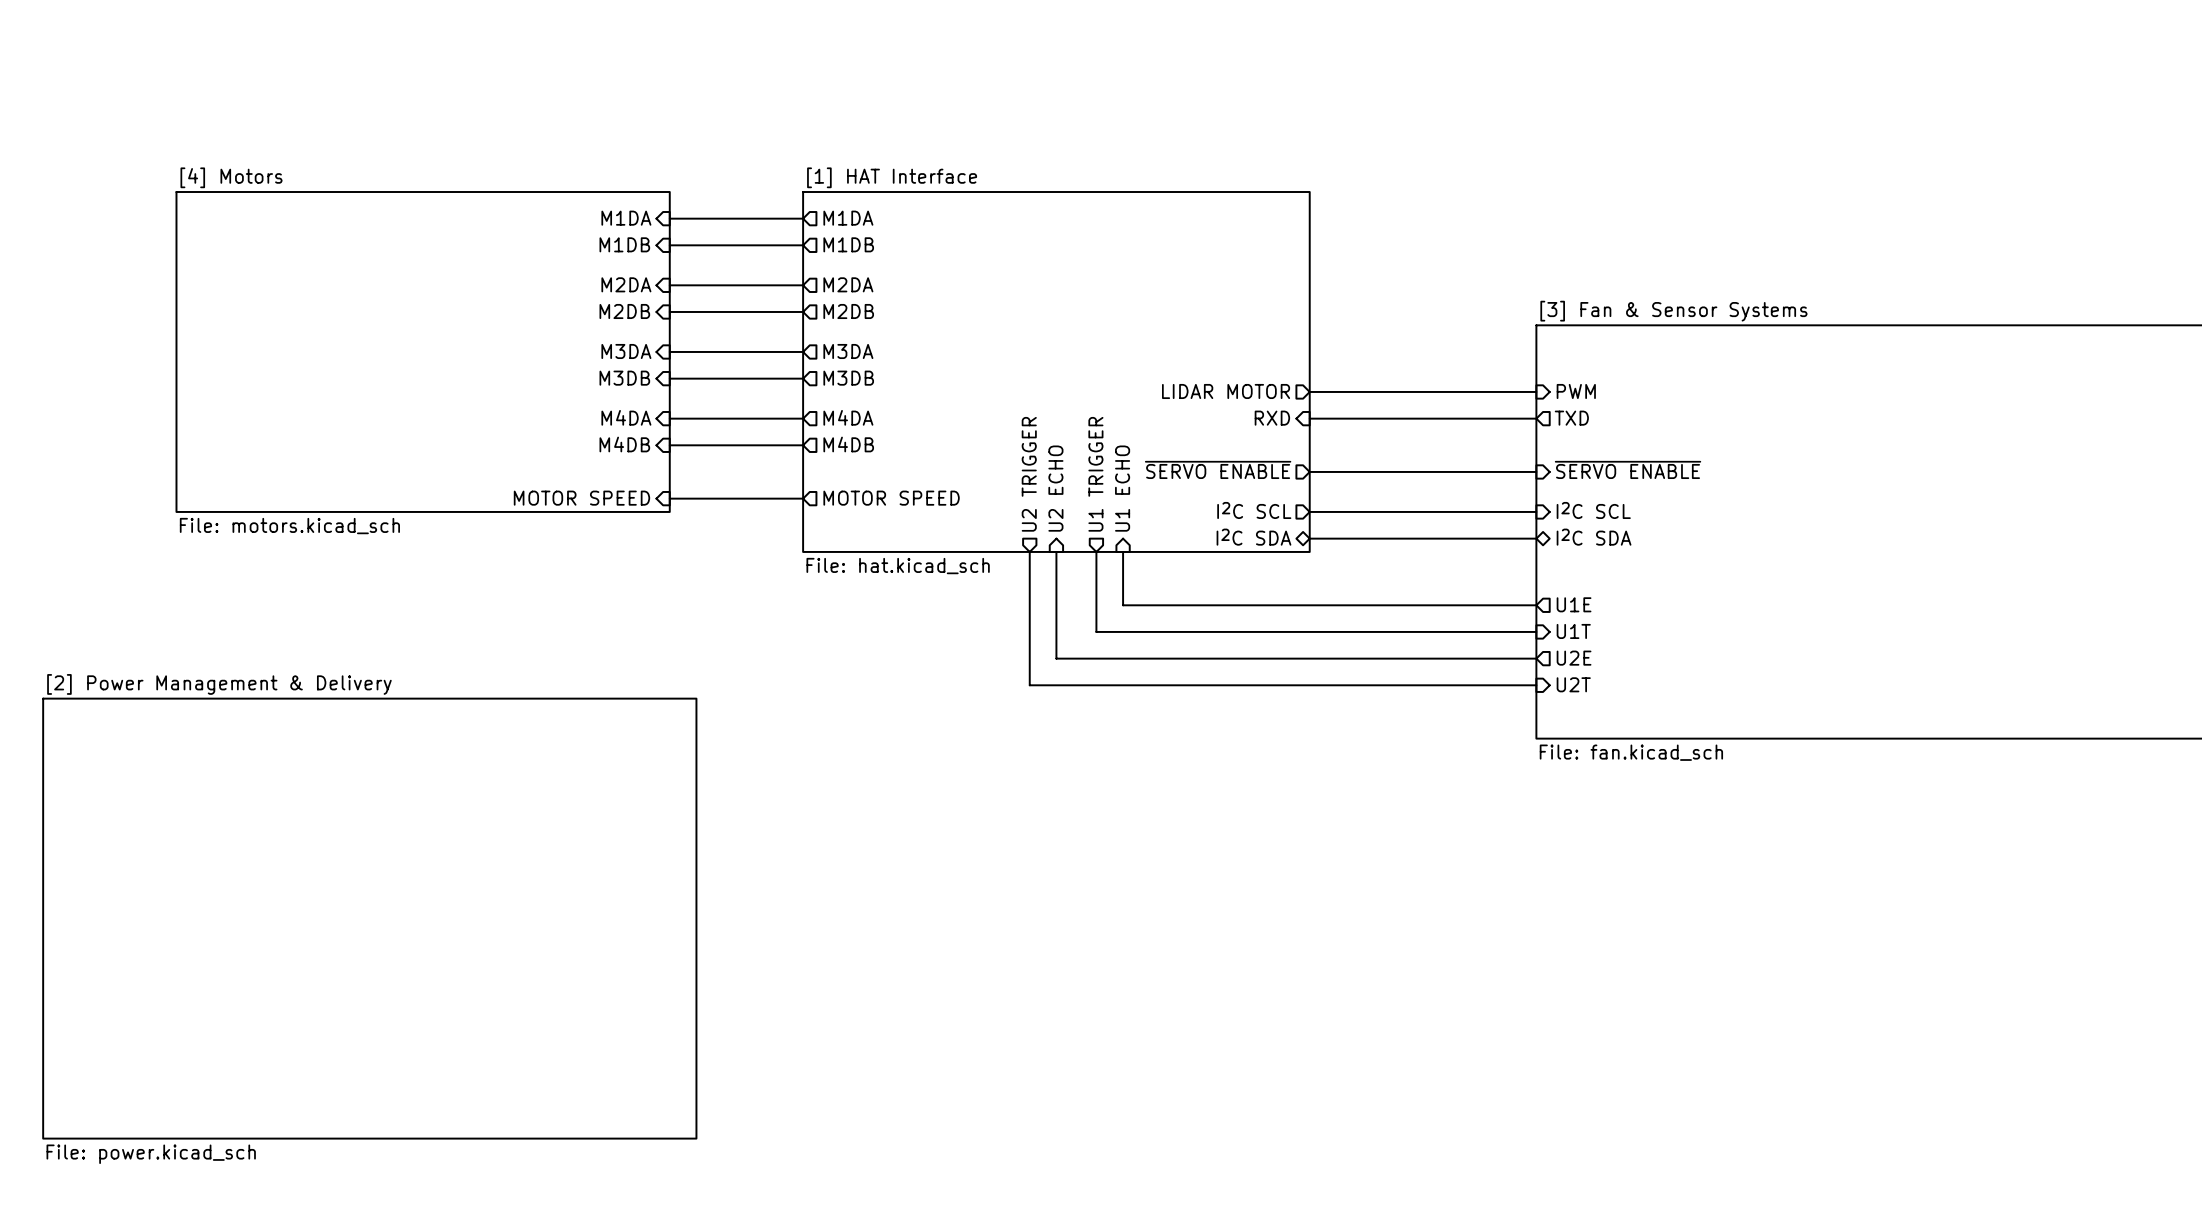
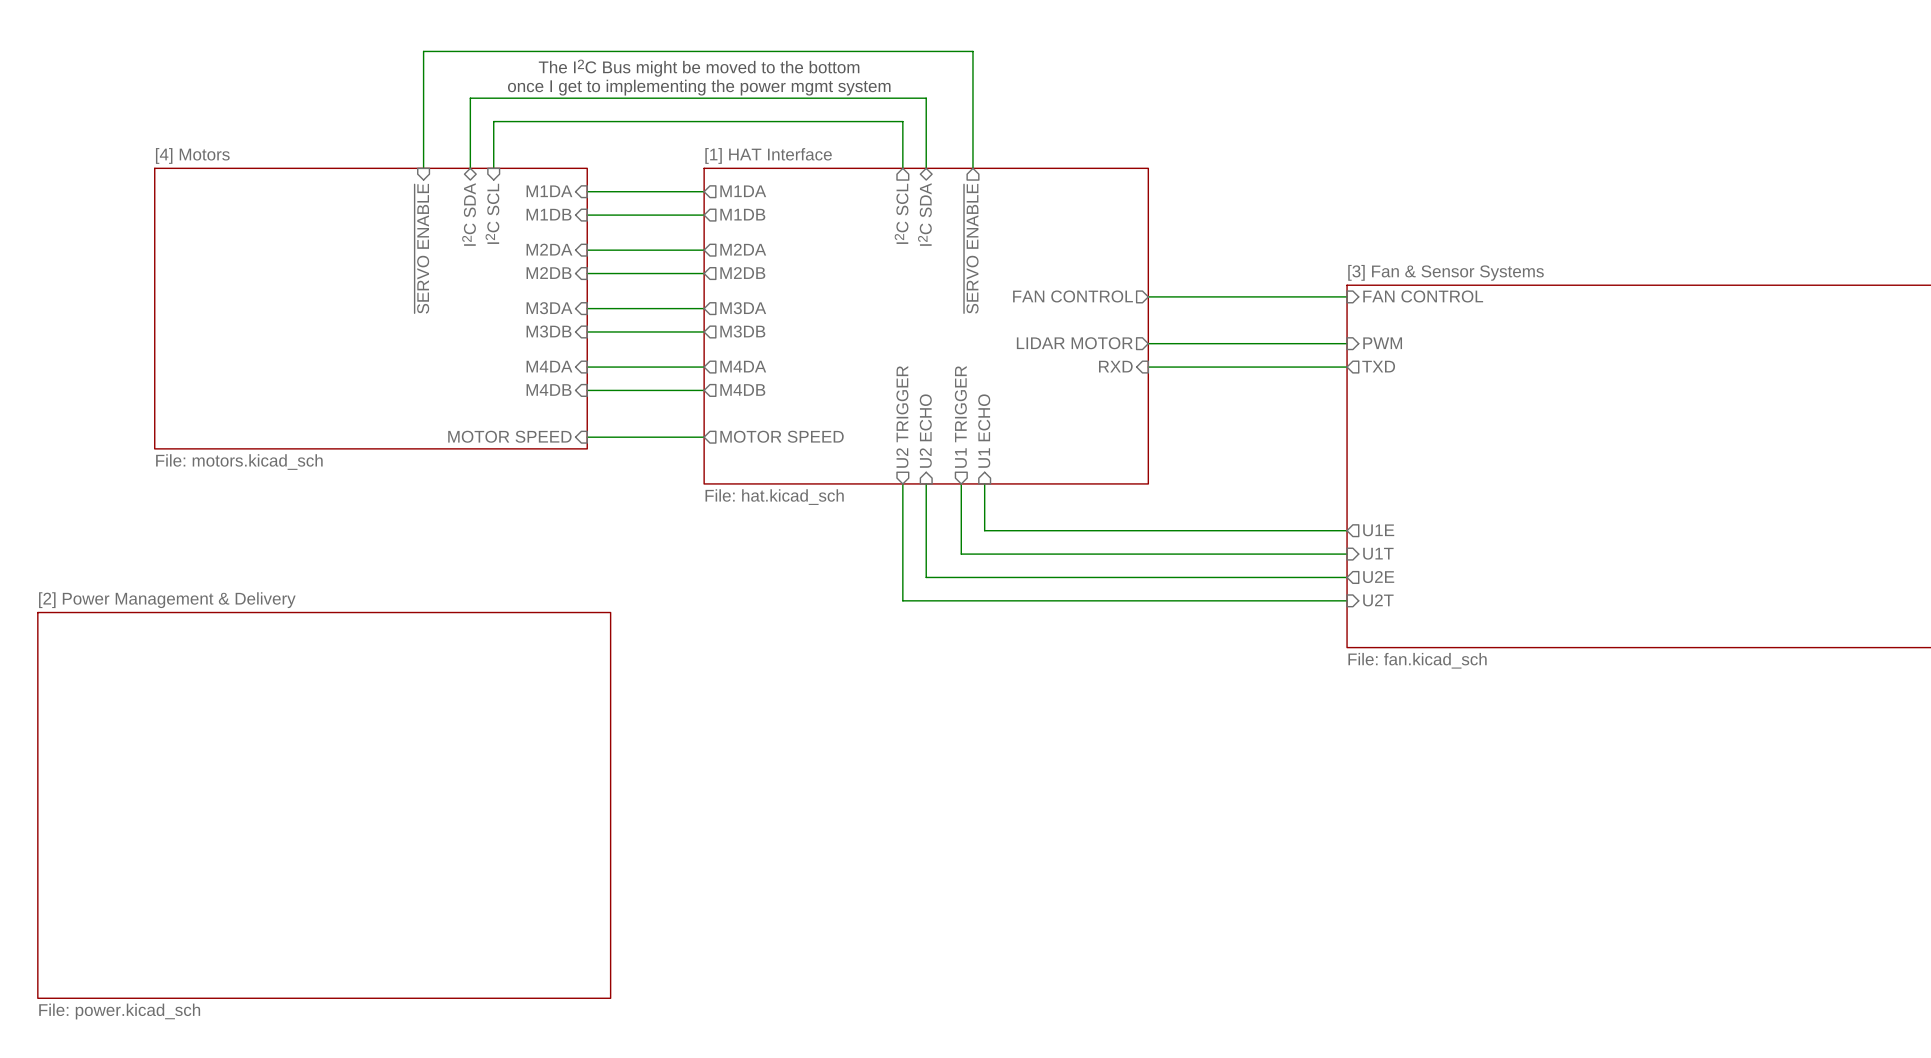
text: none -> The I2C Bus might be moved to the bottom (699, 68)
text: none -> once I get to implementing the power mgmt system (699, 87)
wire: none -> (423, 168) (423, 51) (972, 51) (972, 168)
wire: none -> (470, 168) (470, 98) (926, 98) (926, 168)
wire: none -> (493, 168) (493, 121) (902, 121) (902, 168)
sheet pin: none -> I2C SDA (469, 214)
sheet pin: none -> I2C SCL (492, 213)
sheet pin: none -> I2C SCL (901, 213)
sheet pin: none -> I2C SDA (924, 214)
sheet pin: none -> ~{SERVO ENABLE} (421, 248)
sheet pin: none -> ~{SERVO ENABLE} (971, 248)
sheet pin: none -> FAN CONTROL (1073, 296)
sheet pin: none -> FAN CONTROL (1423, 296)
sheet pin: ~{SERVO ENABLE} (1218, 469) -> none
sheet pin: ~{SERVO ENABLE} (1628, 469) -> none
wire: (1309, 471) (1536, 471) -> (1148, 296) (1347, 296)
sheet pin: I2C SCL (1254, 510) -> none
sheet pin: I2C SCL (1593, 510) -> none
wire: (1309, 511) (1536, 511) -> none
sheet pin: I2C SDA (1253, 537) -> none
sheet pin: I2C SDA (1594, 537) -> none
wire: (1309, 538) (1536, 538) -> none

